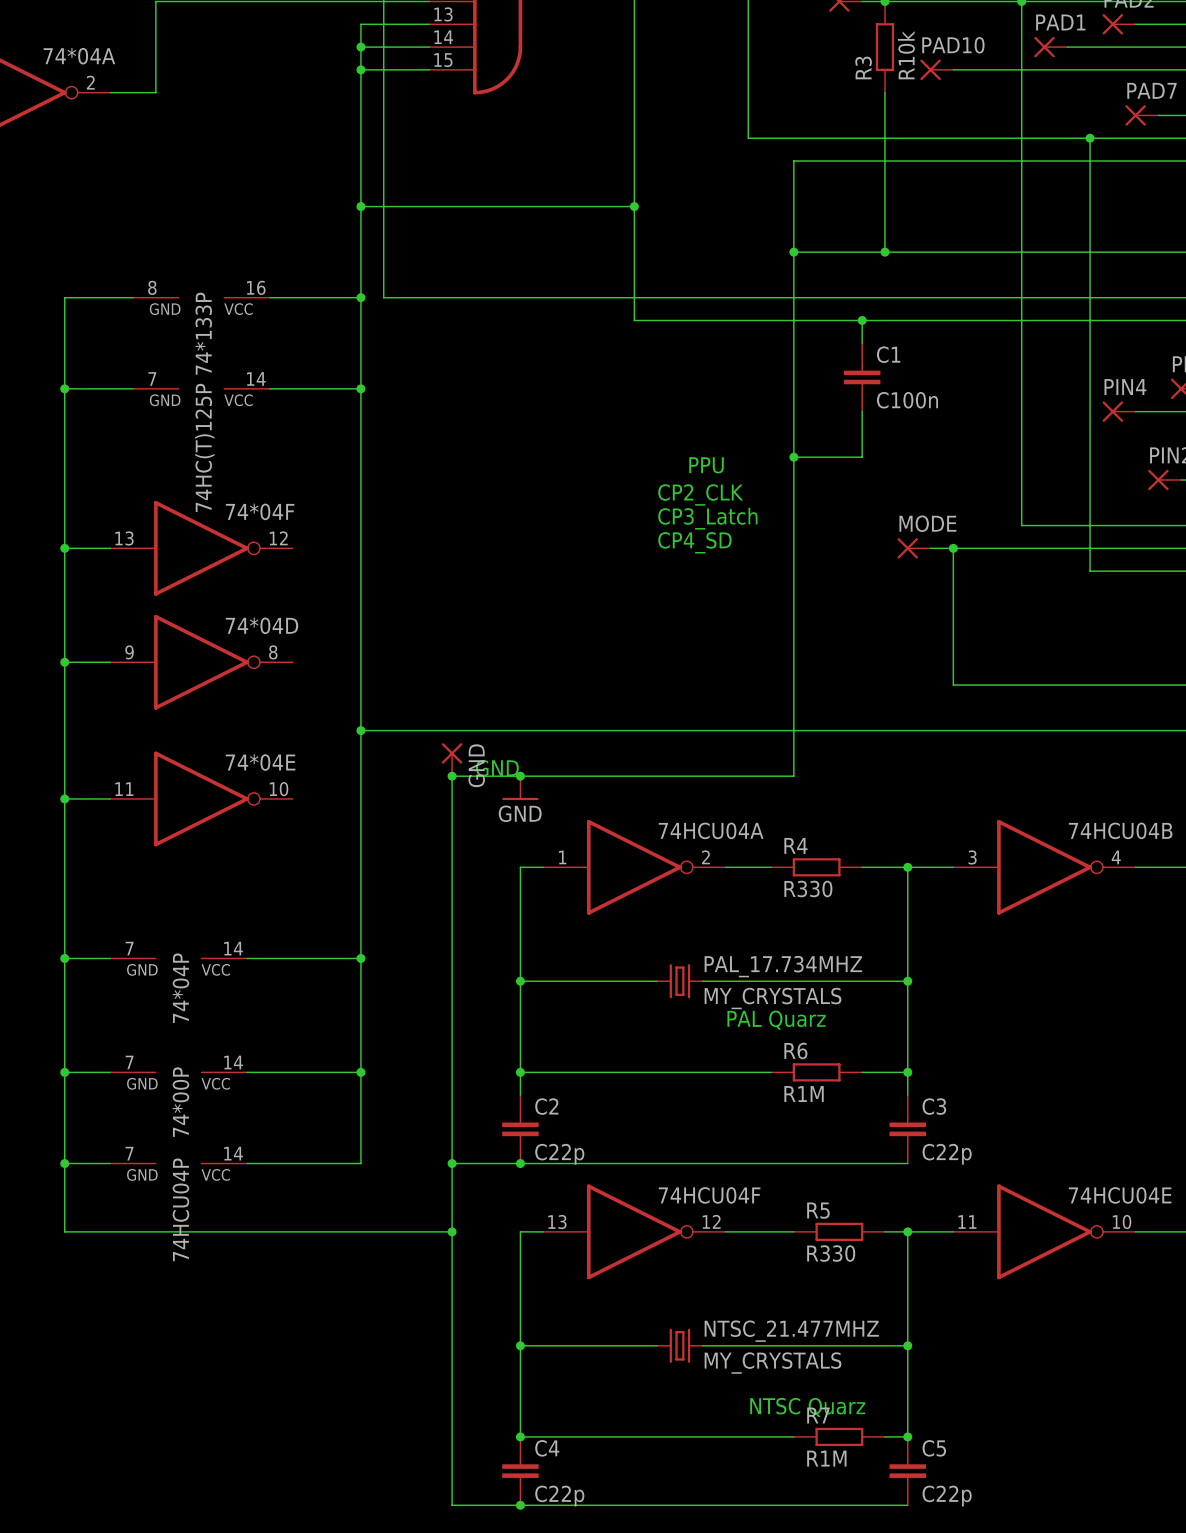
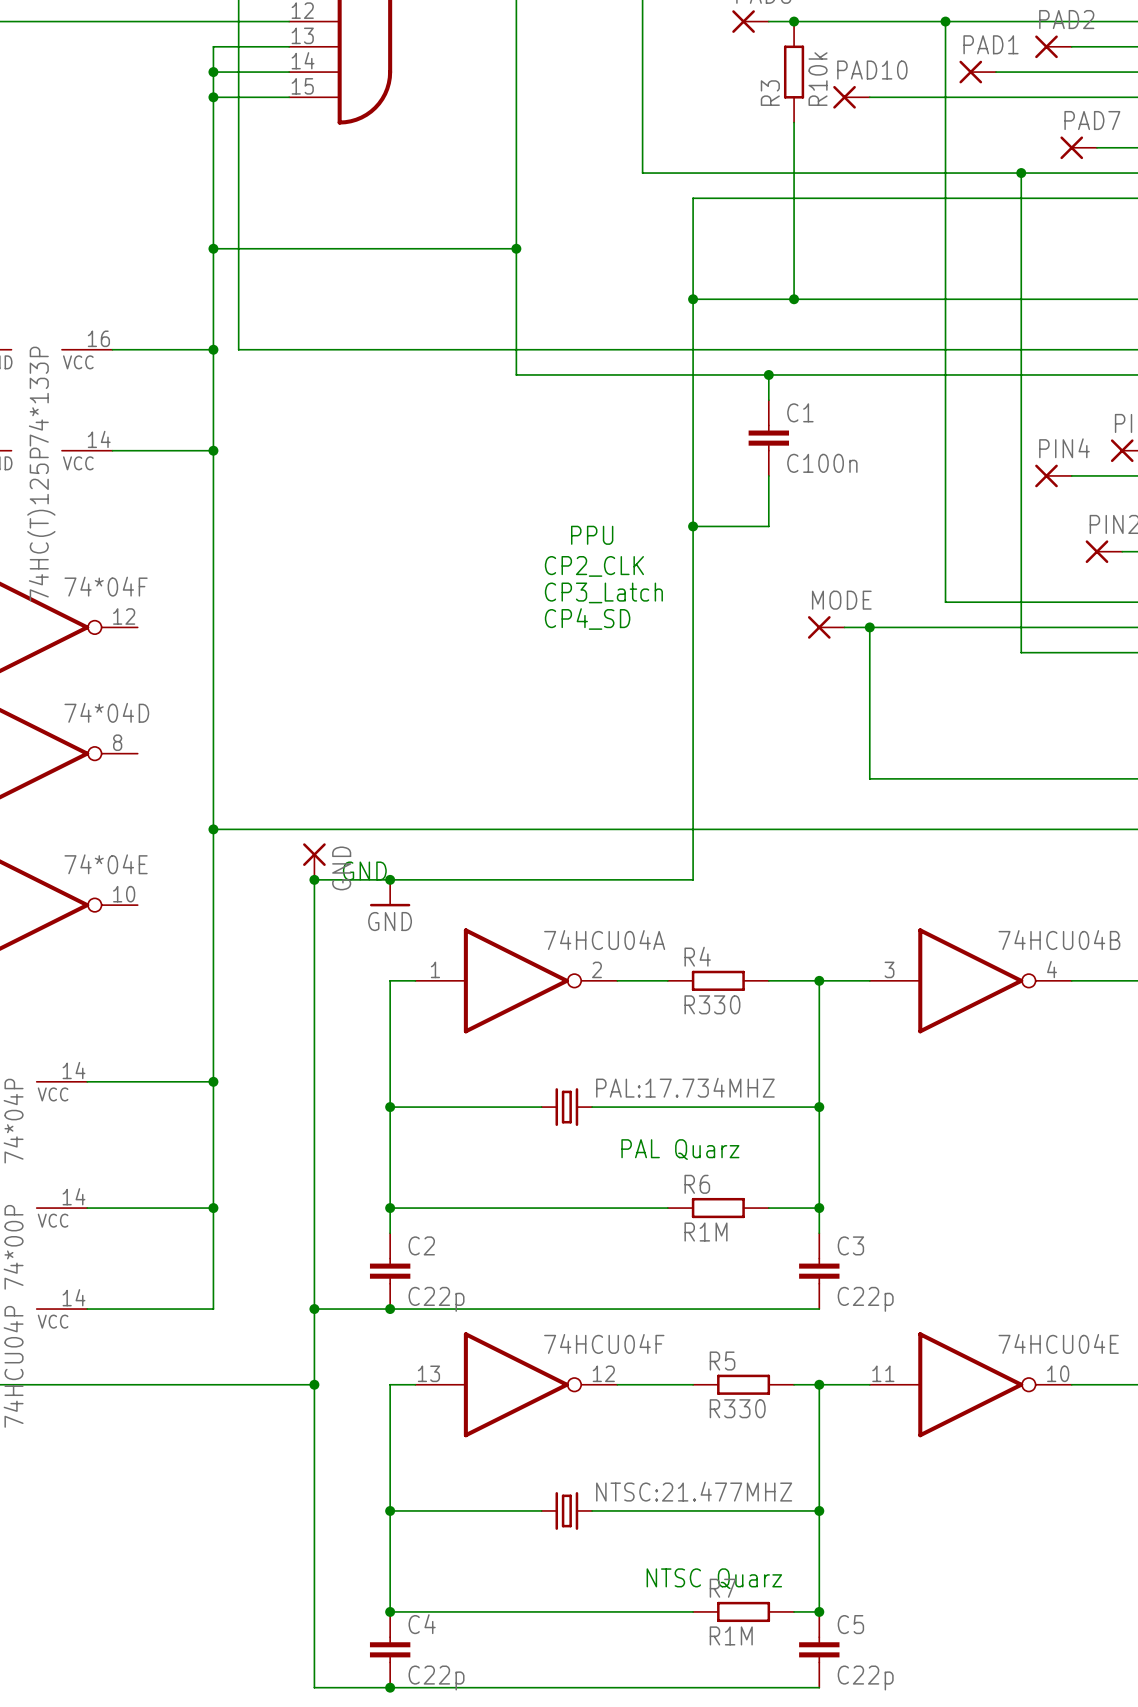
PAL_17.734MHZ name: PAL_17.734MHZ (783, 966) -> PAL:17.734MHZ (685, 1087)
PAL_17.734MHZ value: MY_CRYSTALS (773, 998) -> none
NTSC_21.477MHZ name: NTSC_21.477MHZ (791, 1331) -> NTSC:21.477MHZ (694, 1491)
NTSC_21.477MHZ value: MY_CRYSTALS (773, 1363) -> none

